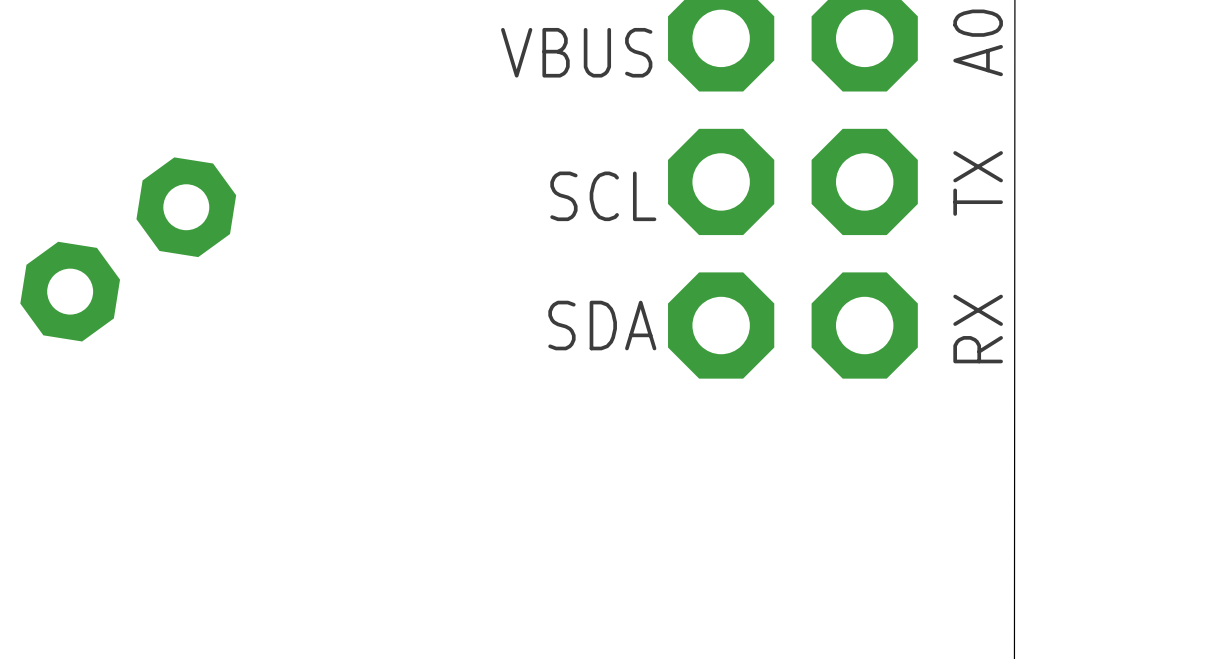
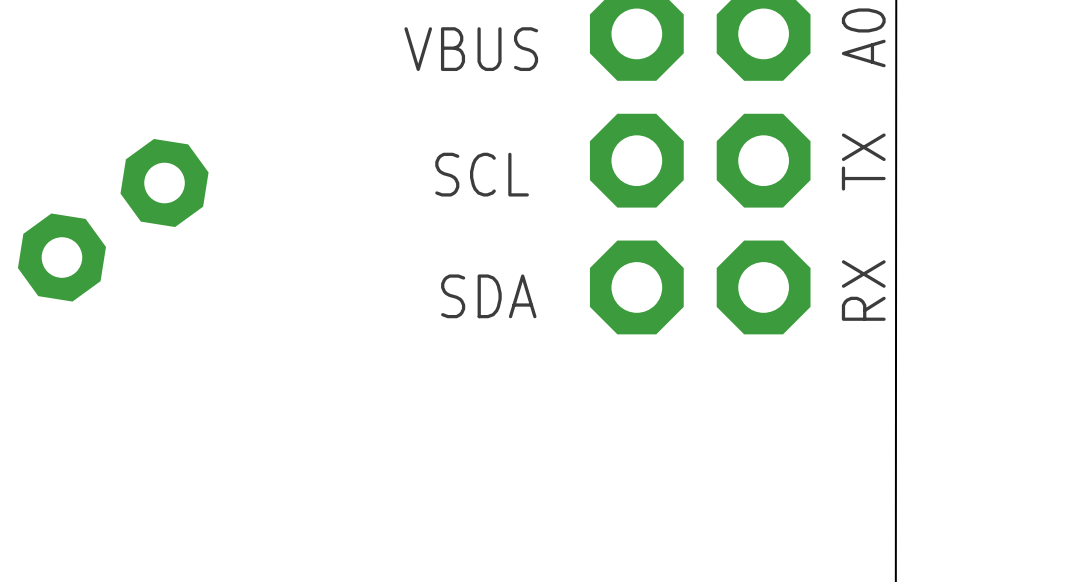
text position: VBUS (576, 52) -> VBUS (471, 49)
text position: SCL (603, 196) -> SCL (482, 174)
text position: SDA (602, 325) -> SDA (488, 296)

